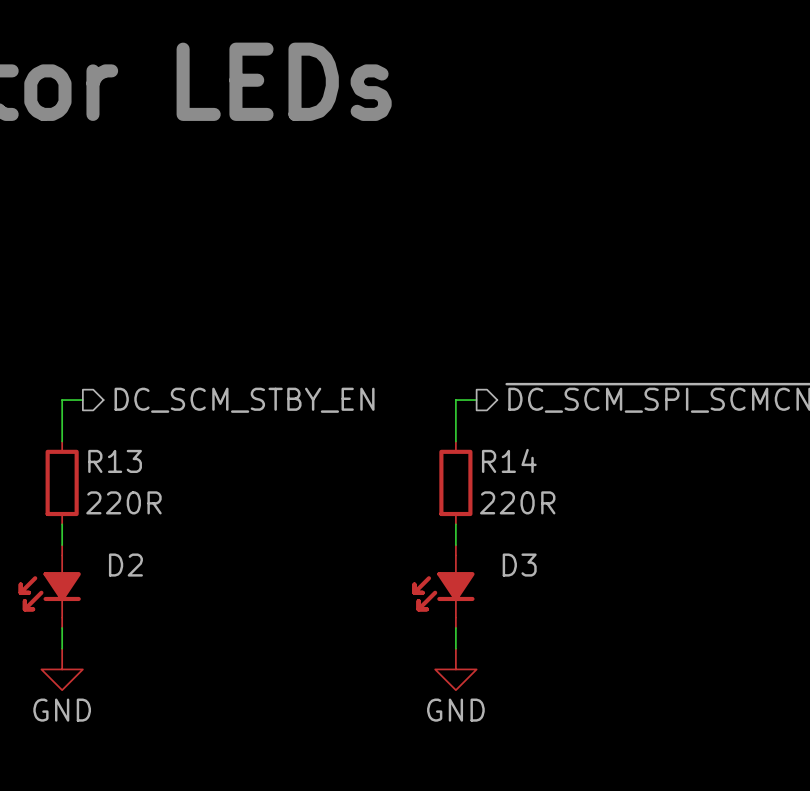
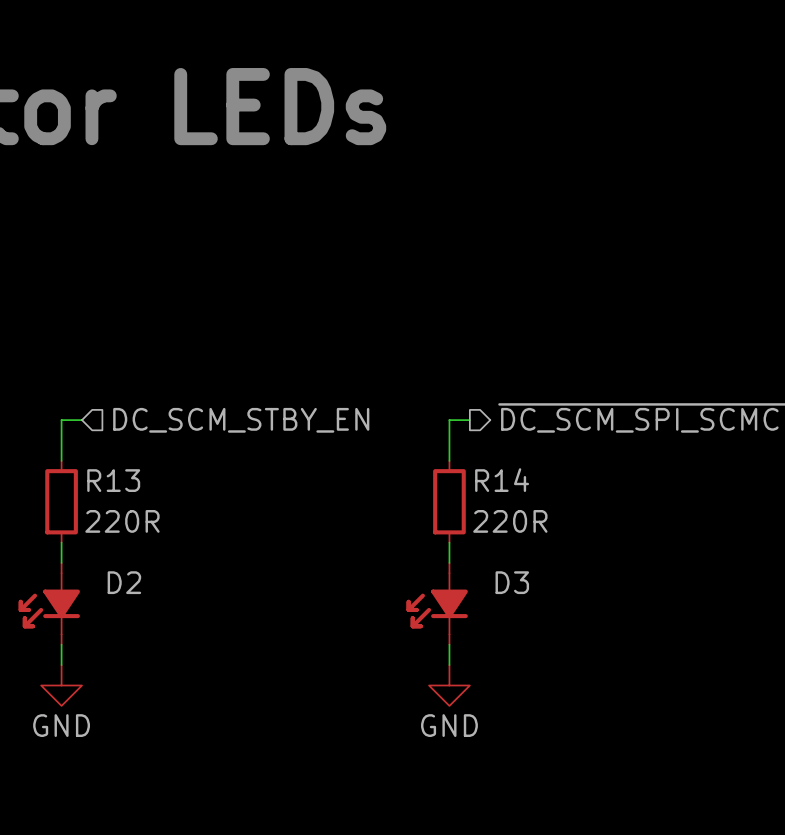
hierarchical label shape: output (244, 400) -> input (241, 420)

